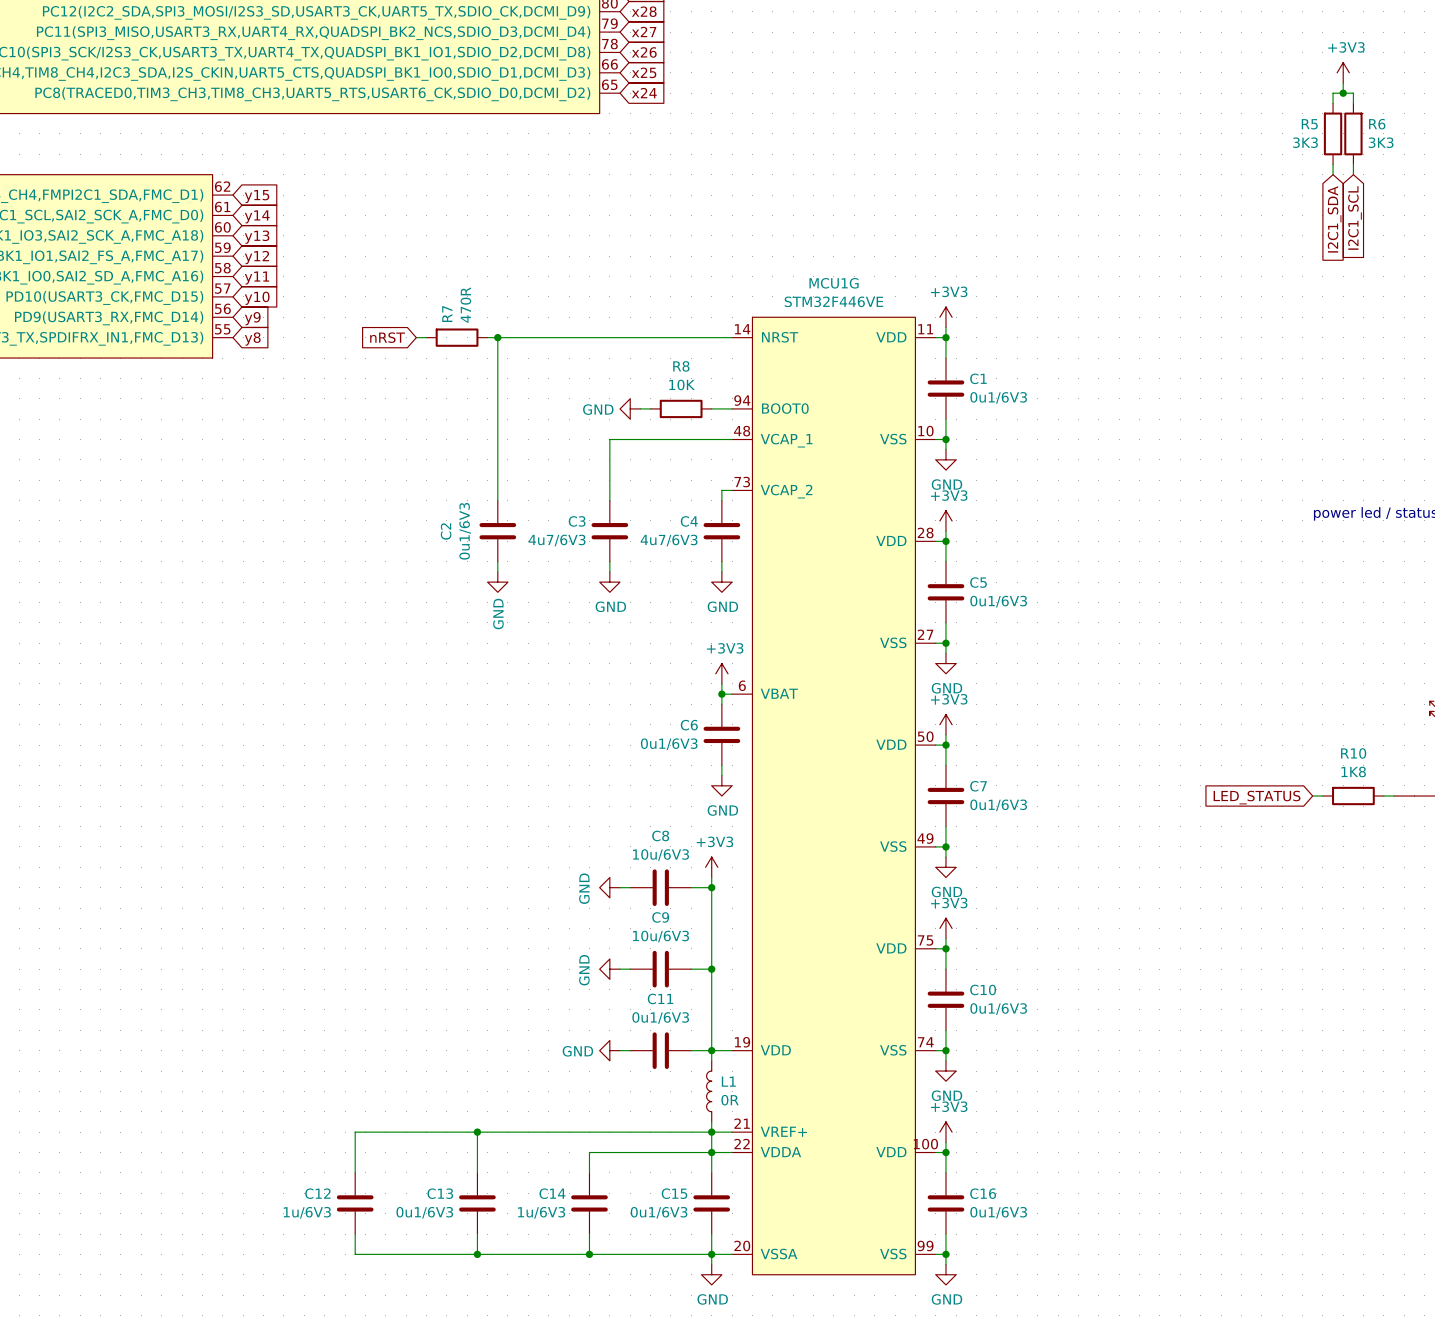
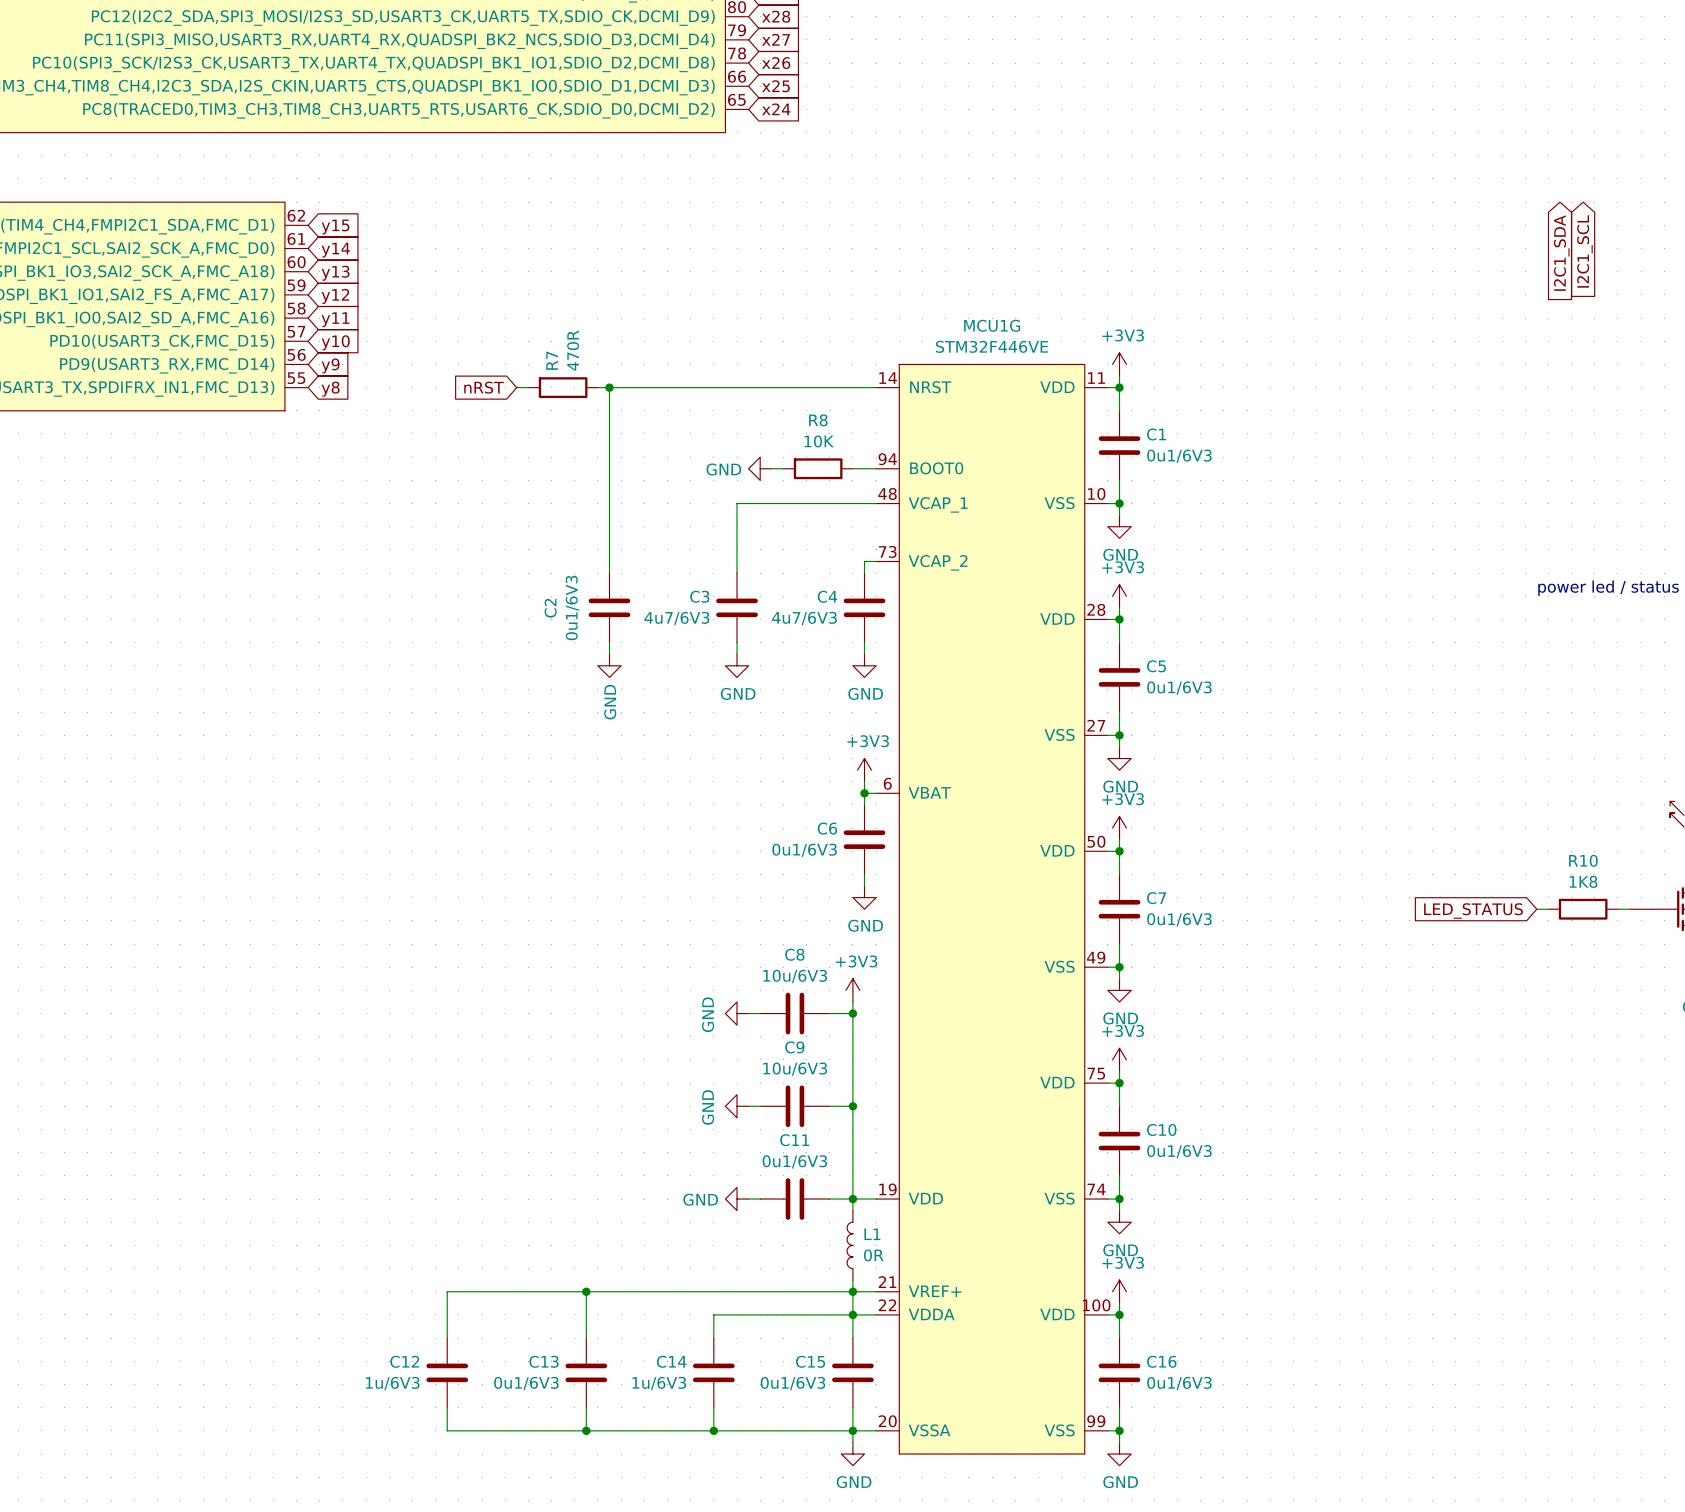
power symbol: +3V3 (1343, 72) -> none
wire: (1343, 83) (1343, 93) -> none
junction: (1343, 93) -> none
wire: (1333, 103) (1333, 93) (1353, 93) (1353, 103) -> none
R5: 3K3 (1333, 133) -> none
R6: 3K3 (1353, 133) -> none
wire: (1333, 164) (1333, 174) -> none
wire: (1353, 164) (1353, 174) -> none

